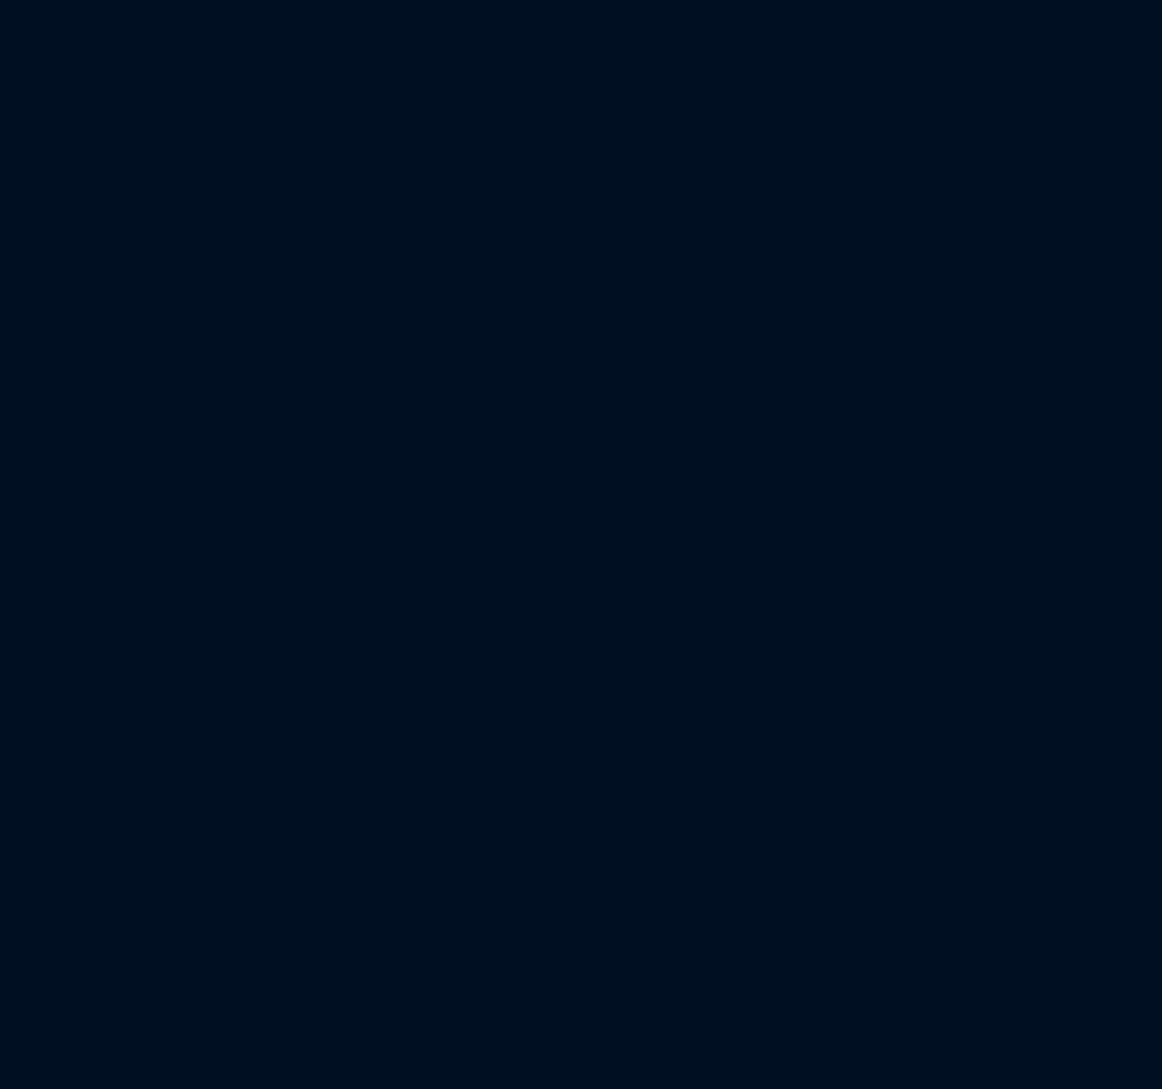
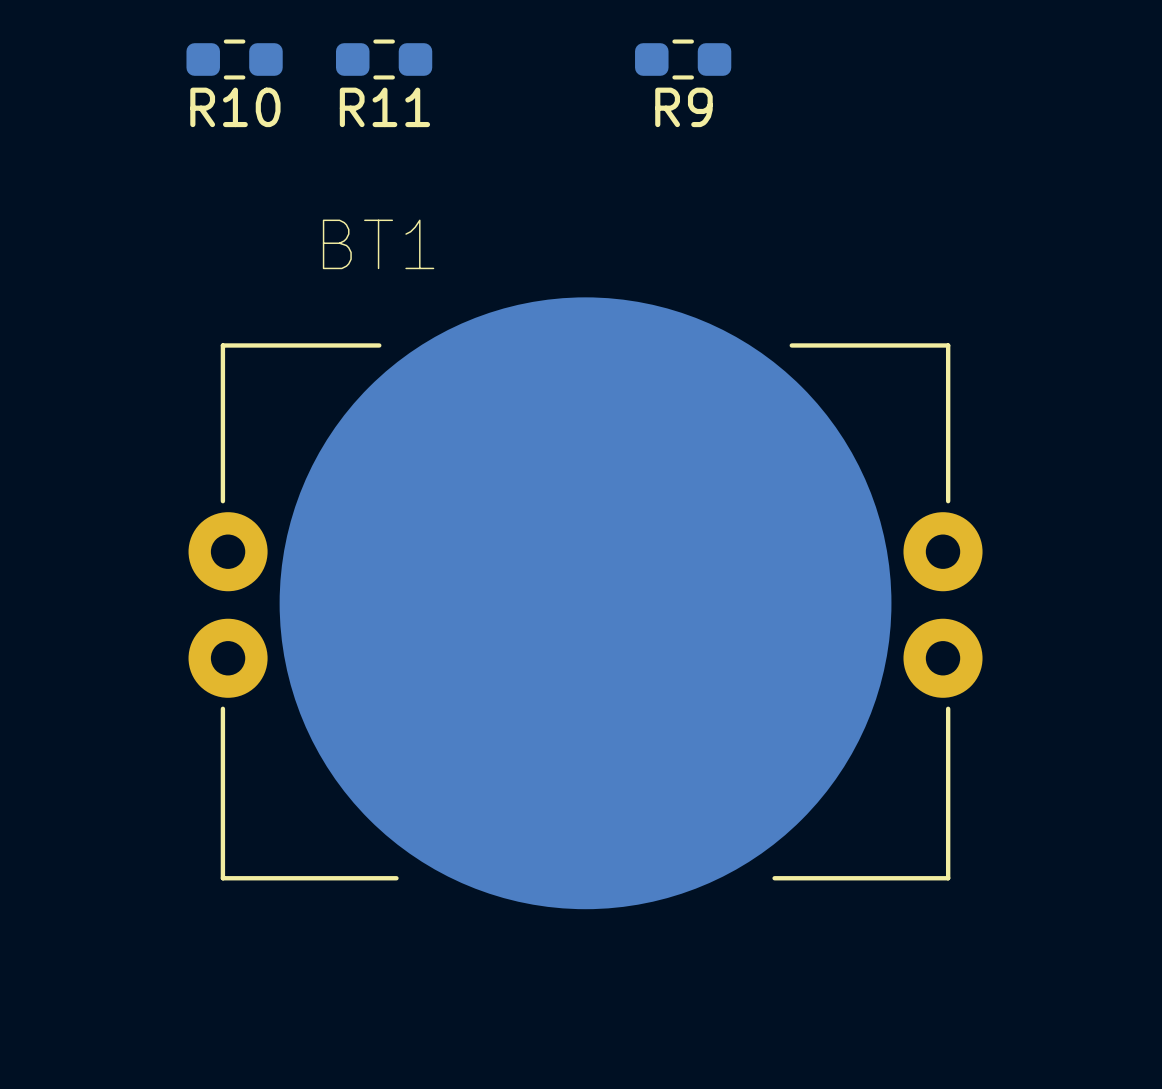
R10: none -> (234, 59)
R11: none -> (384, 59)
R9: none -> (683, 59)
BT1: none -> (585, 603)

